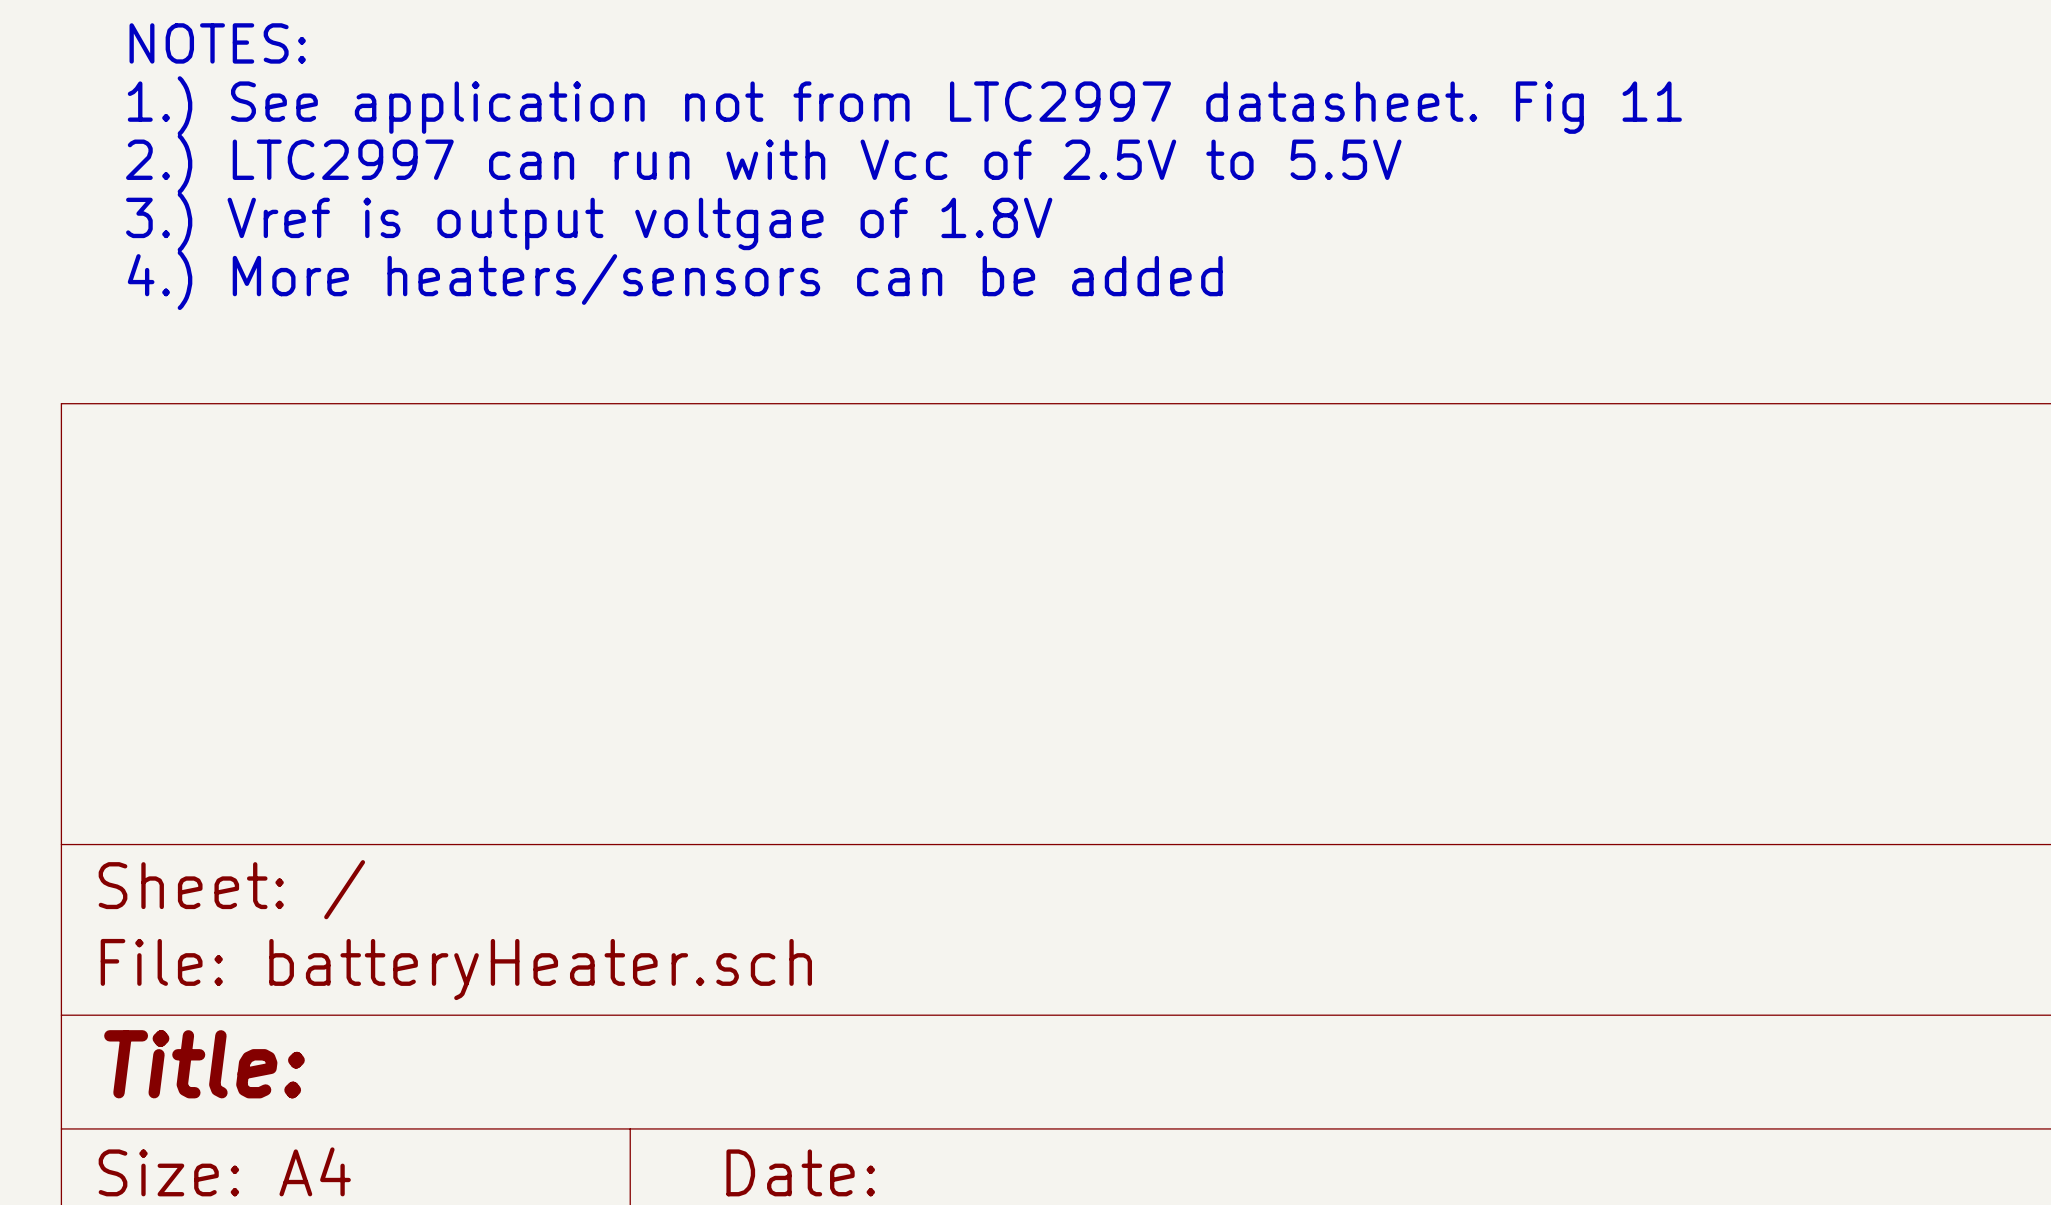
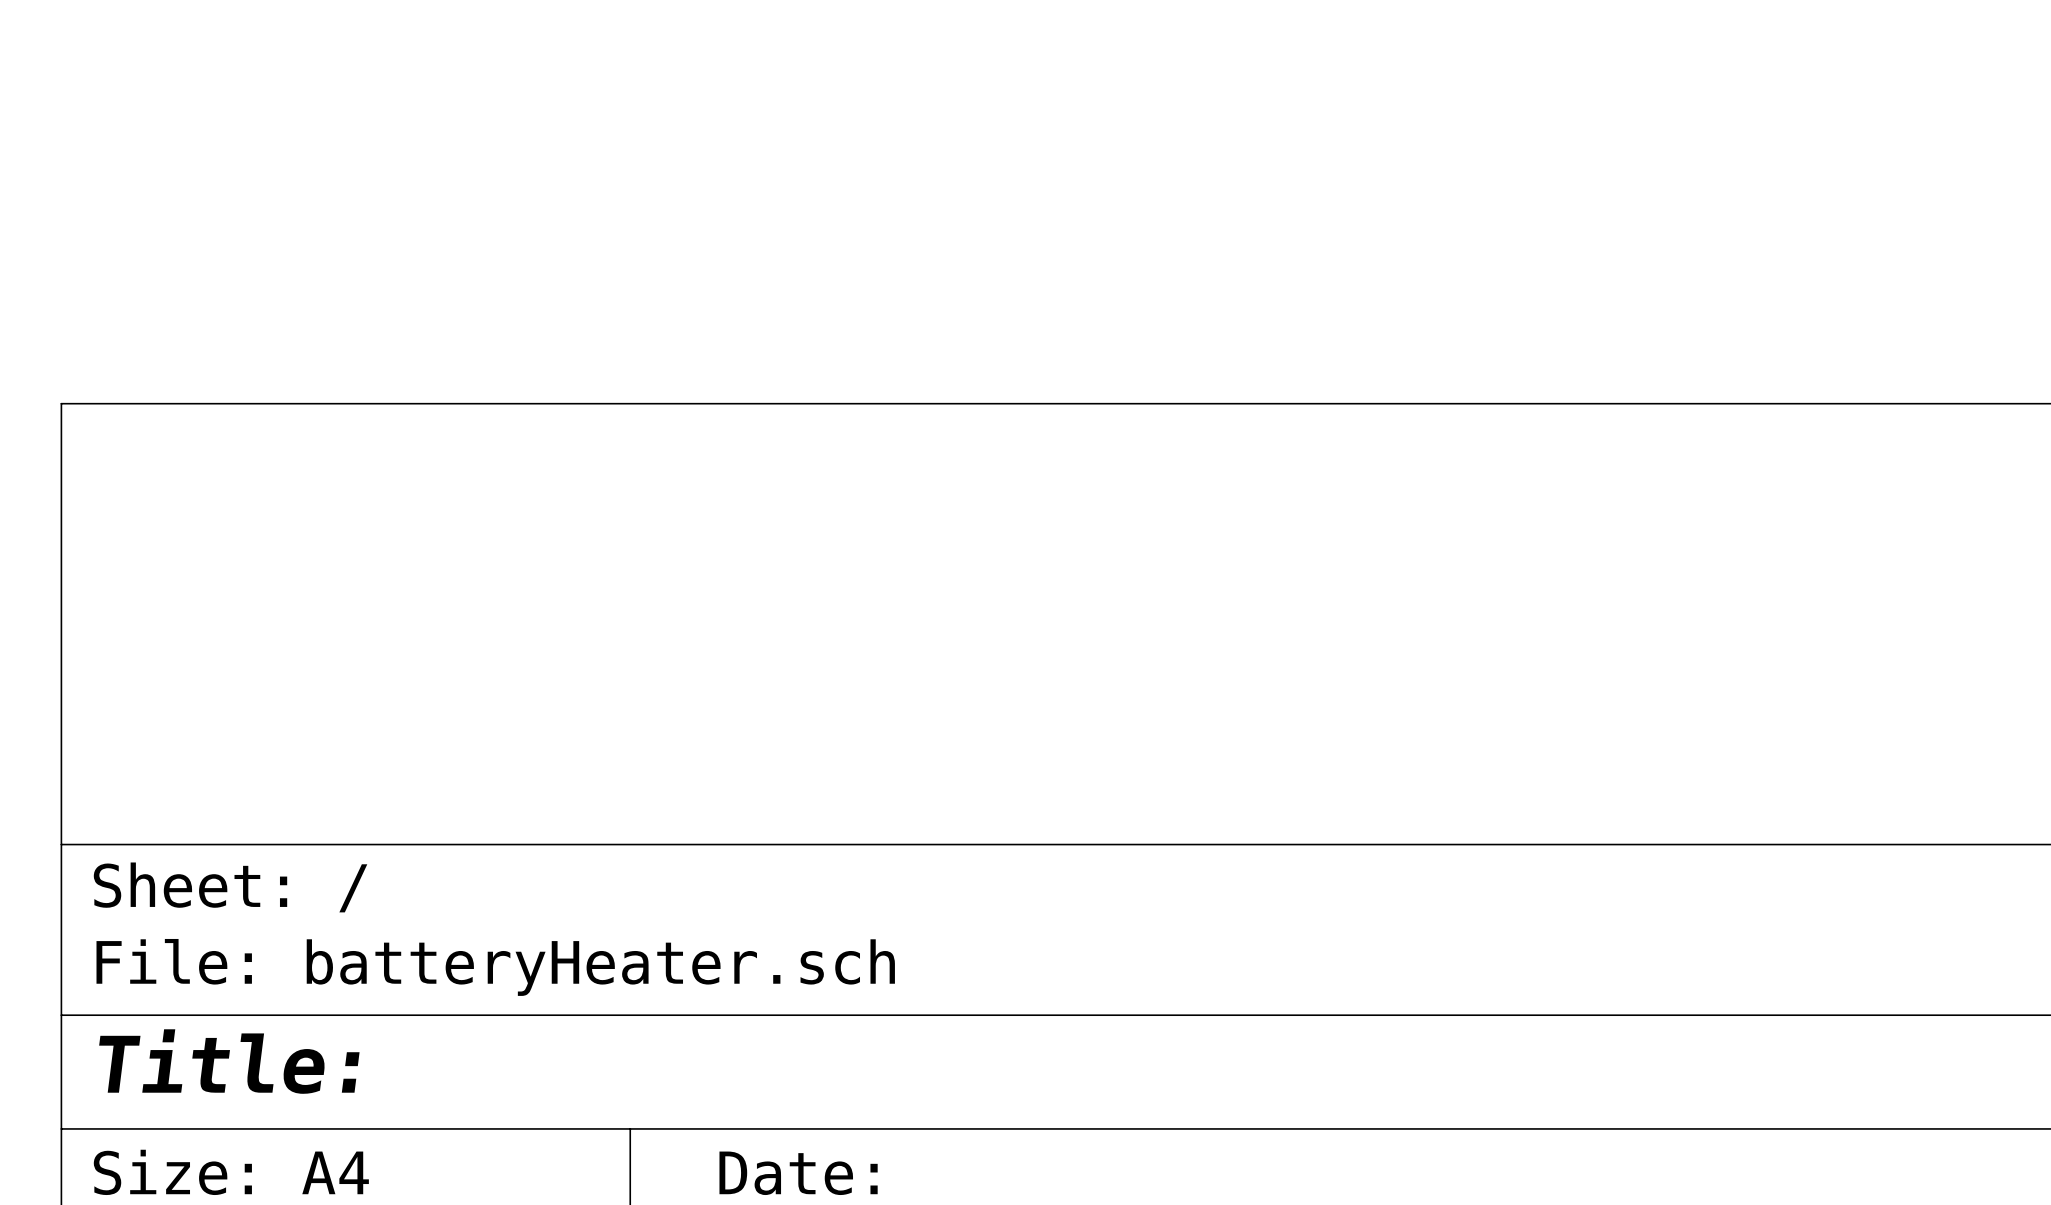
text: NOTES: (217, 43) -> none
text: 1.) See application not from LTC2997 datasheet. Fig 11 (904, 105) -> none
text: 2.) LTC2997 can run with Vcc of 2.5V to 5.5V (763, 164) -> none
text: 3.) Vref is output voltgae of 1.8V (589, 222) -> none
text: 4.) More heaters/sensors can be added (675, 280) -> none

